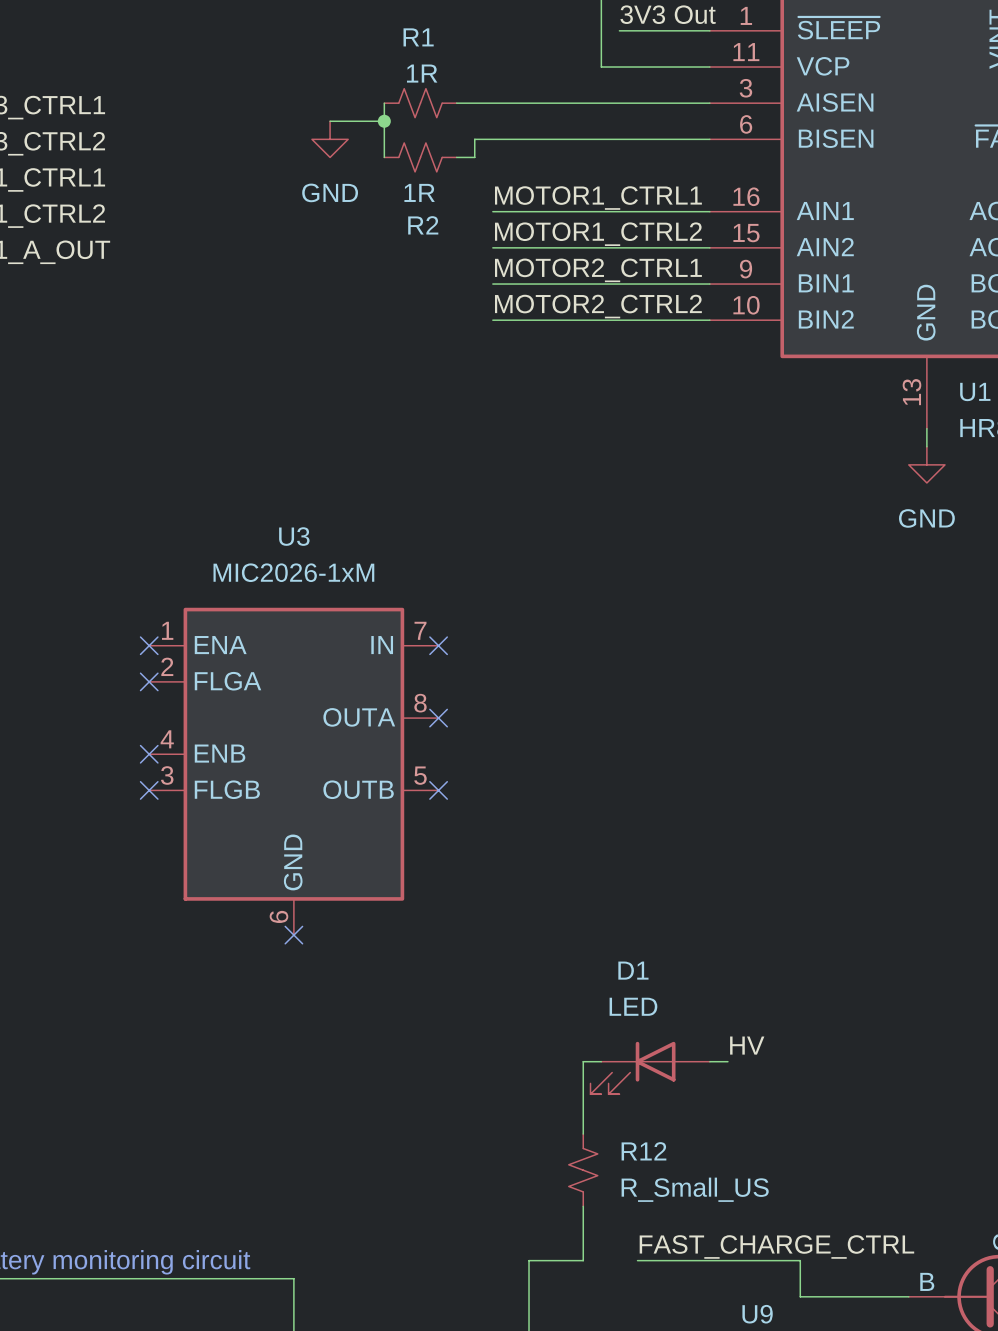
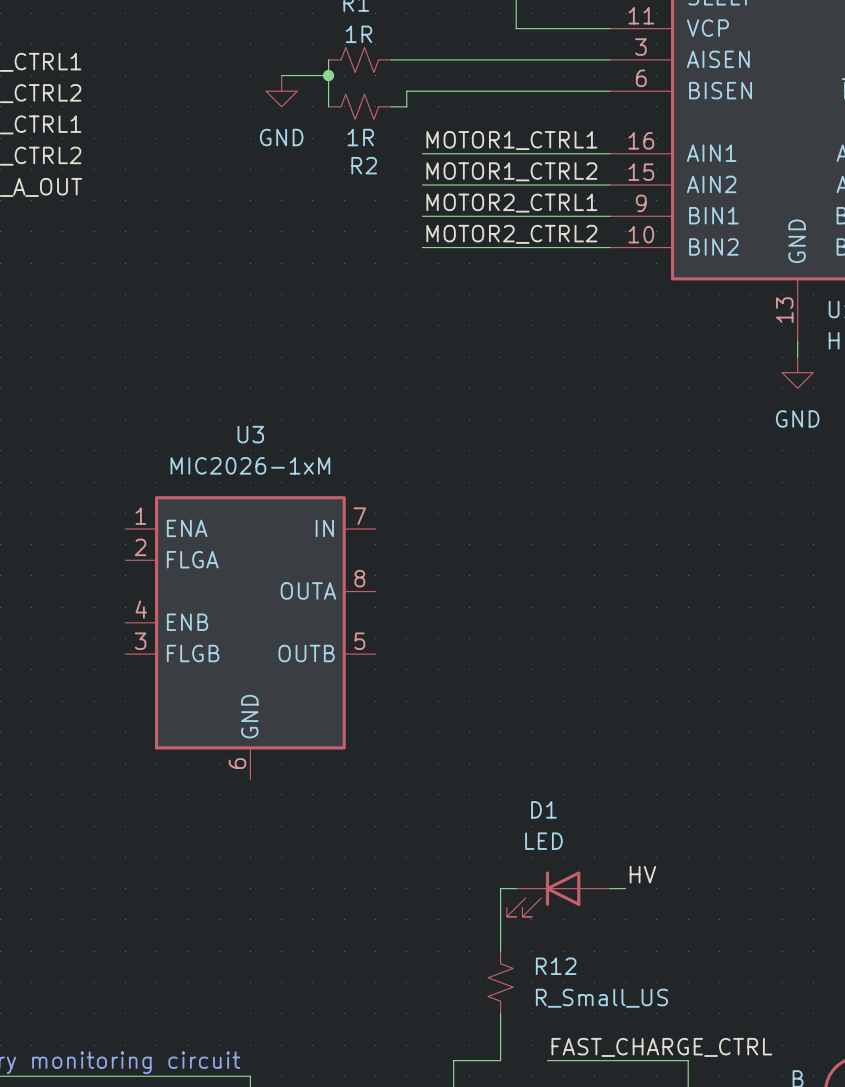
no-connect mark: (149, 645) -> none
no-connect mark: (438, 645) -> none
no-connect mark: (149, 681) -> none
no-connect mark: (438, 718) -> none
no-connect mark: (149, 754) -> none
no-connect mark: (149, 790) -> none
no-connect mark: (438, 790) -> none
no-connect mark: (293, 935) -> none

